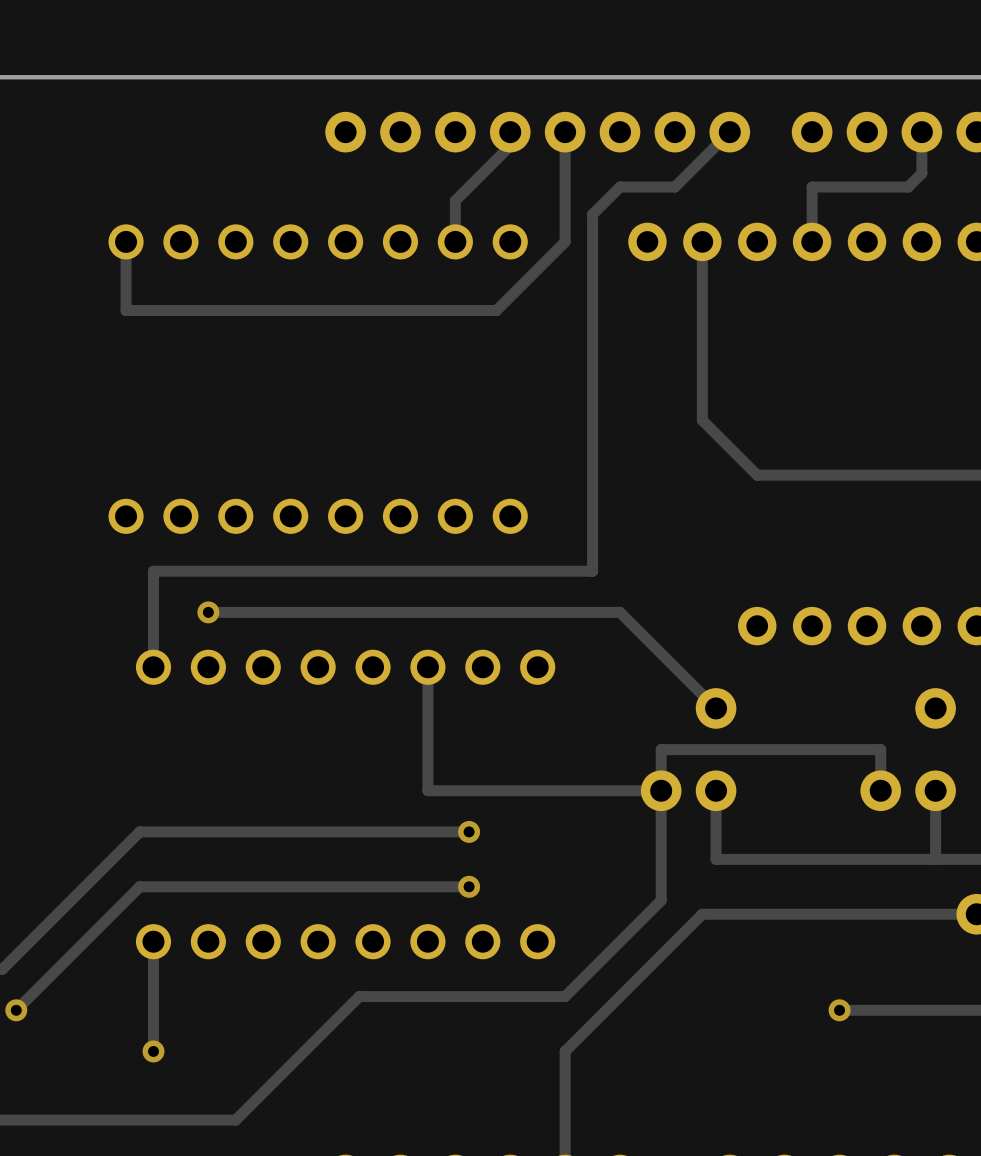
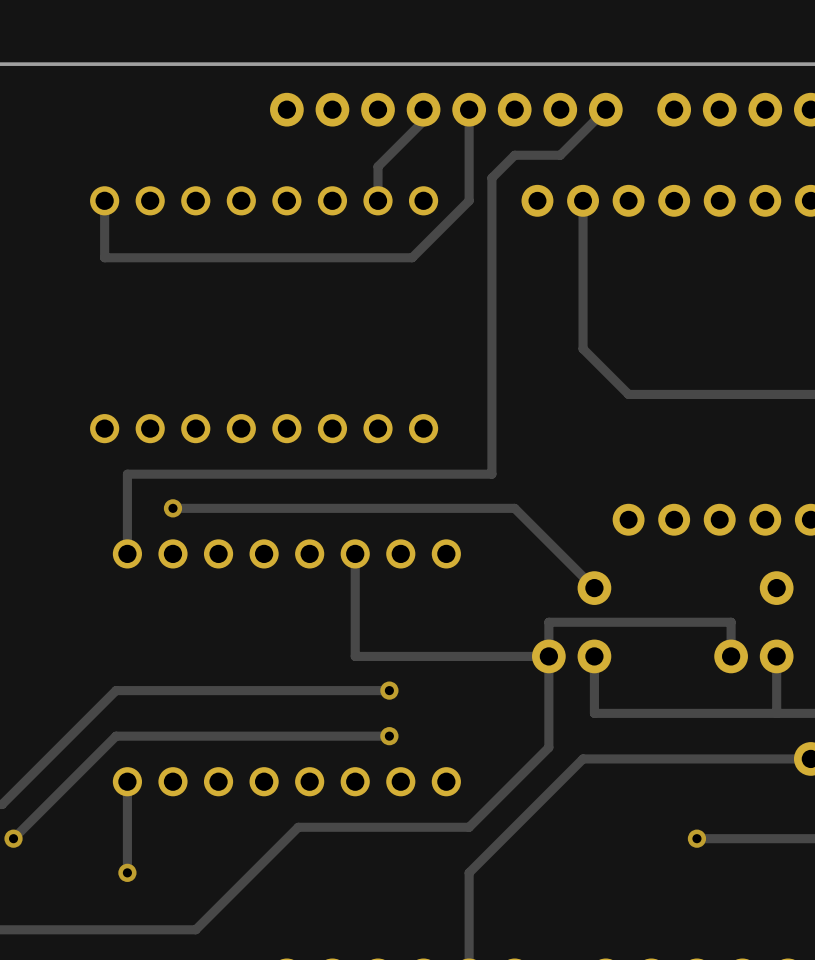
track: (921, 132) (921, 173) (908, 187) (812, 187) (812, 241) -> none

